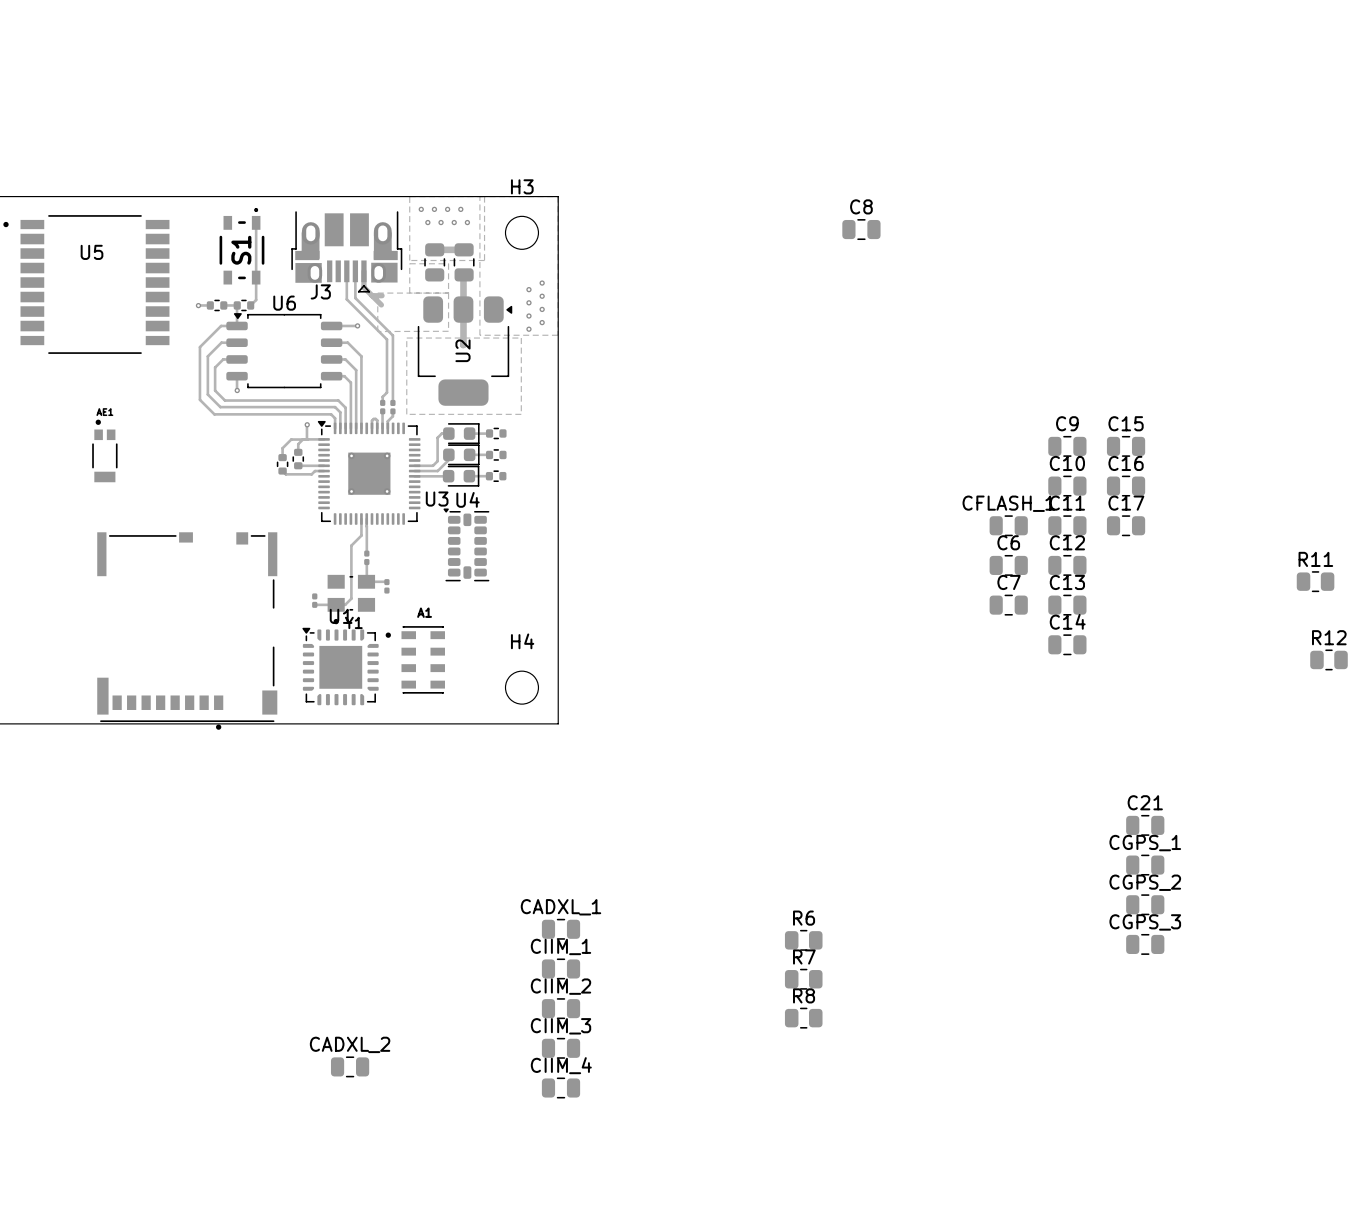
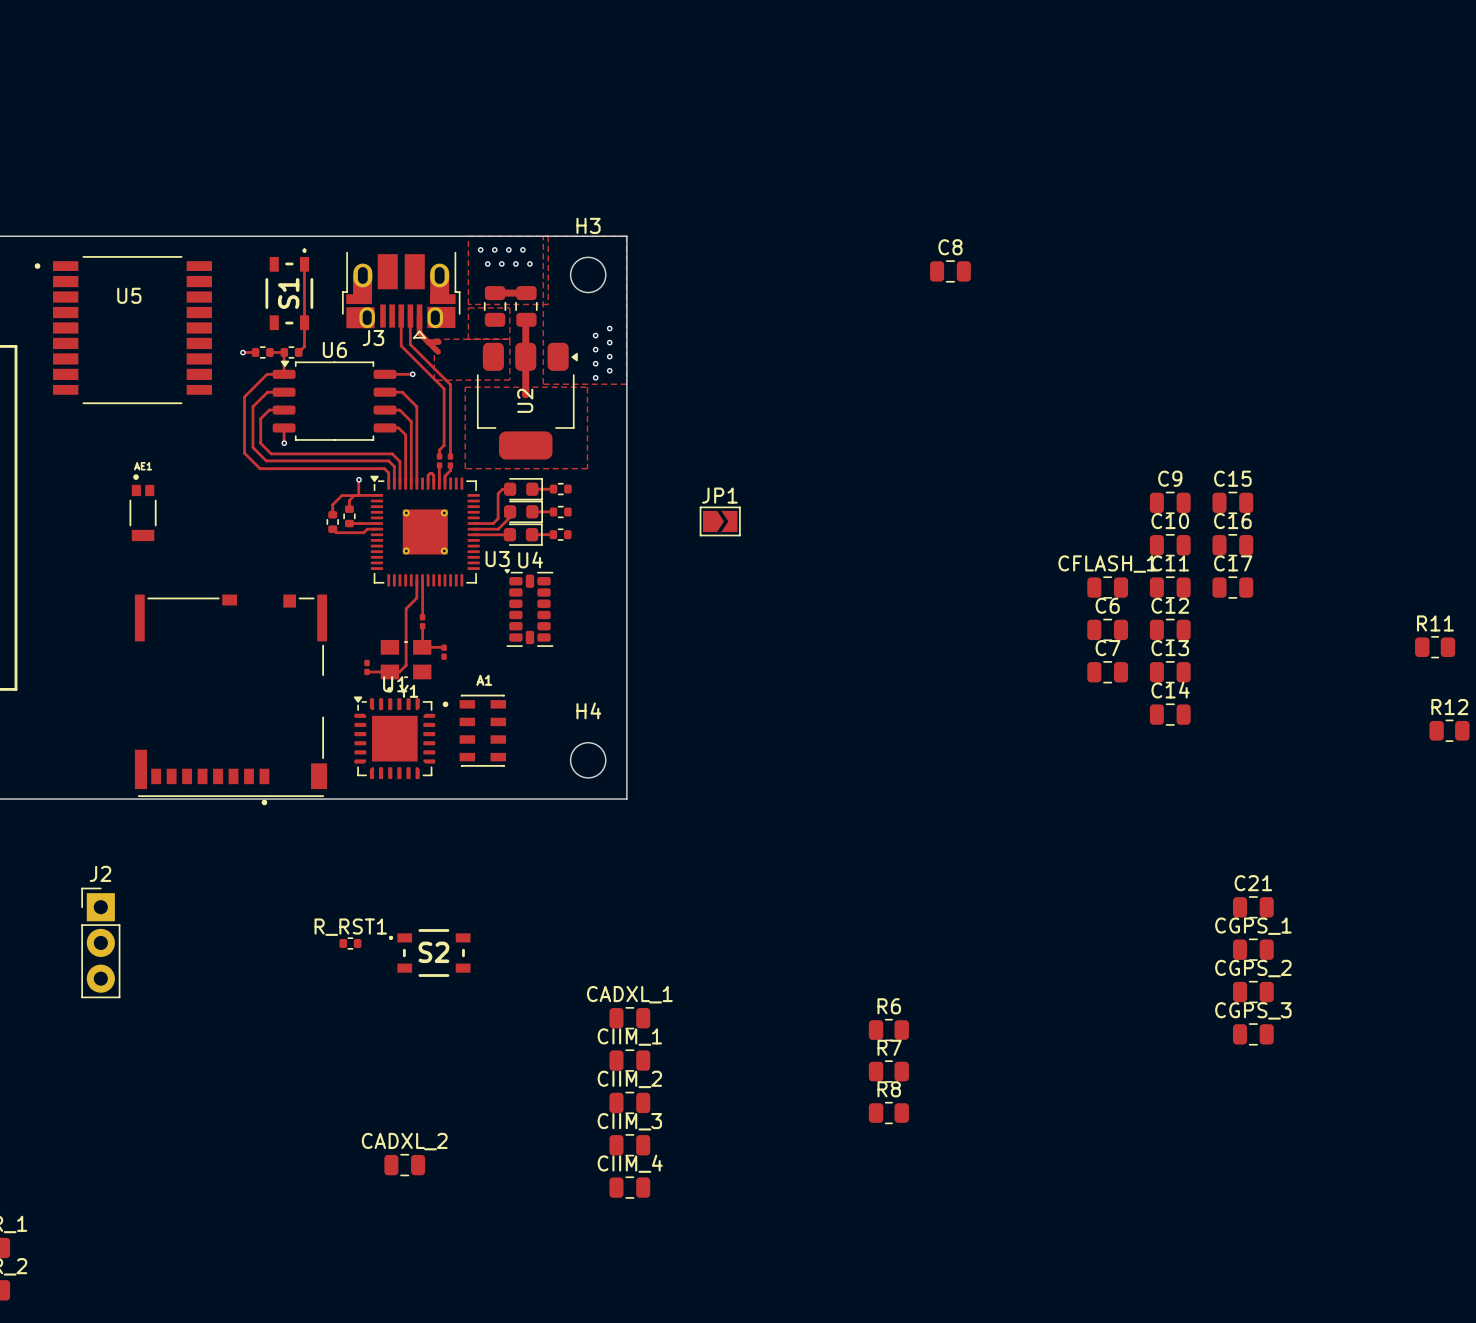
JP1: none -> (720, 521)
J2: none -> (100, 942)
R_RST1: none -> (350, 943)
S2: none -> (429, 953)

